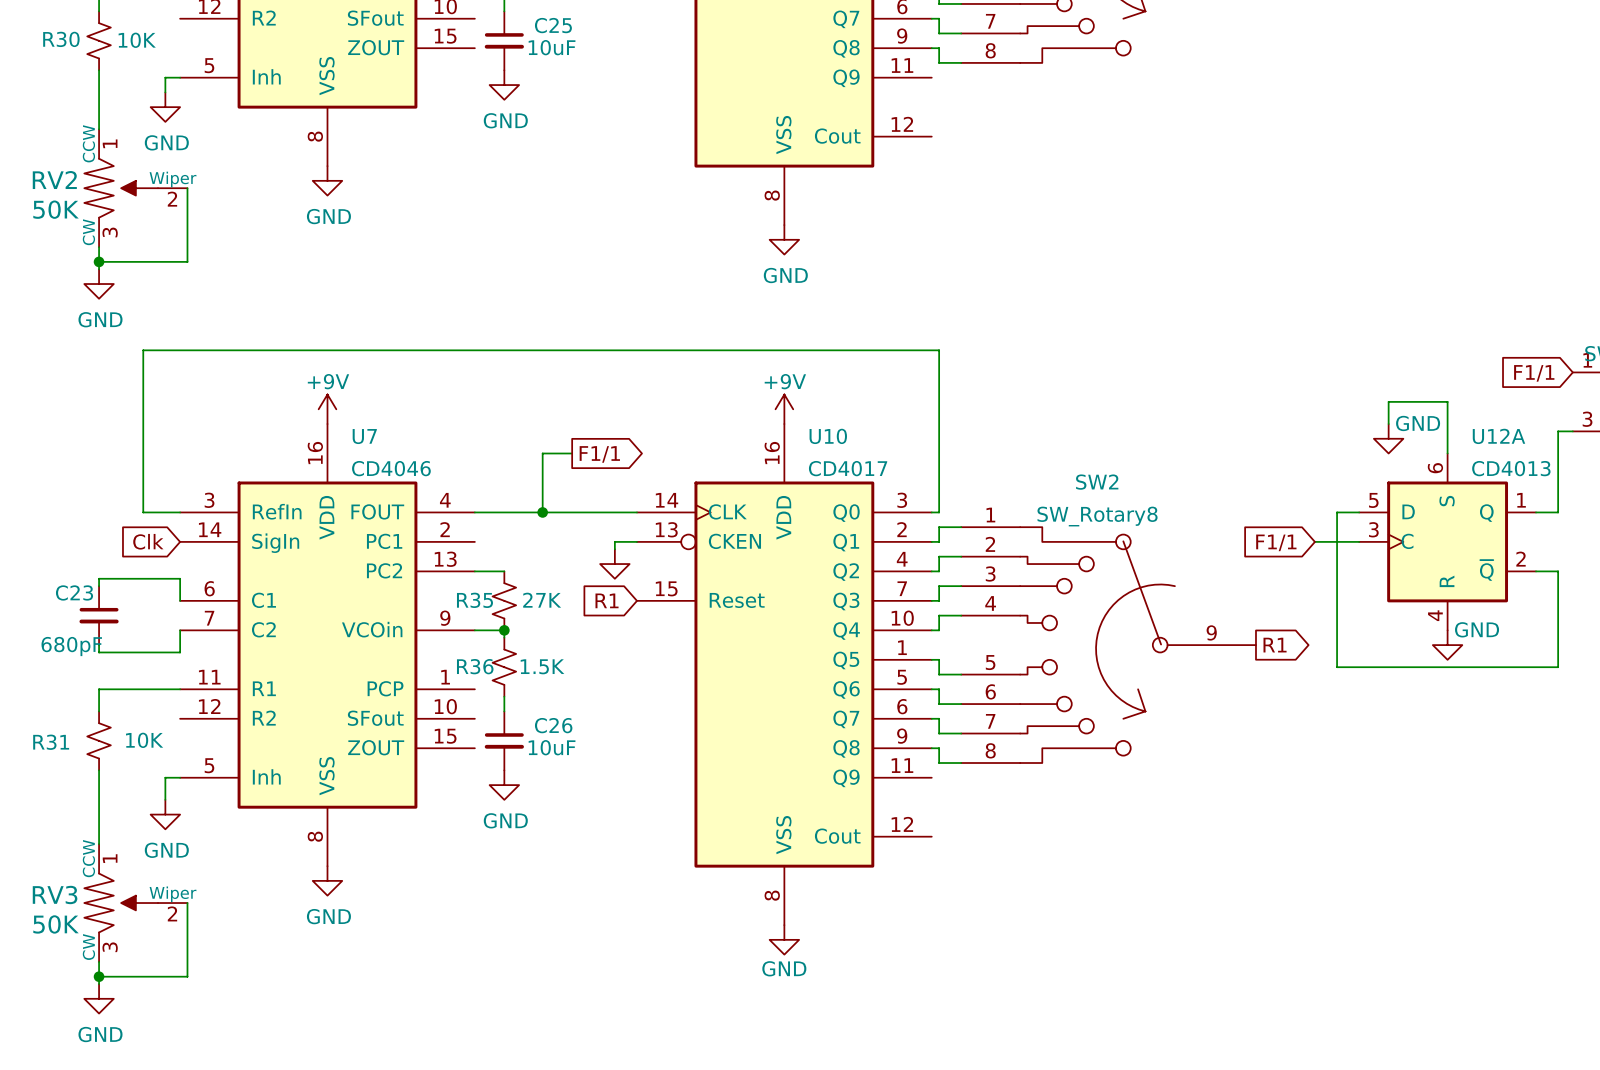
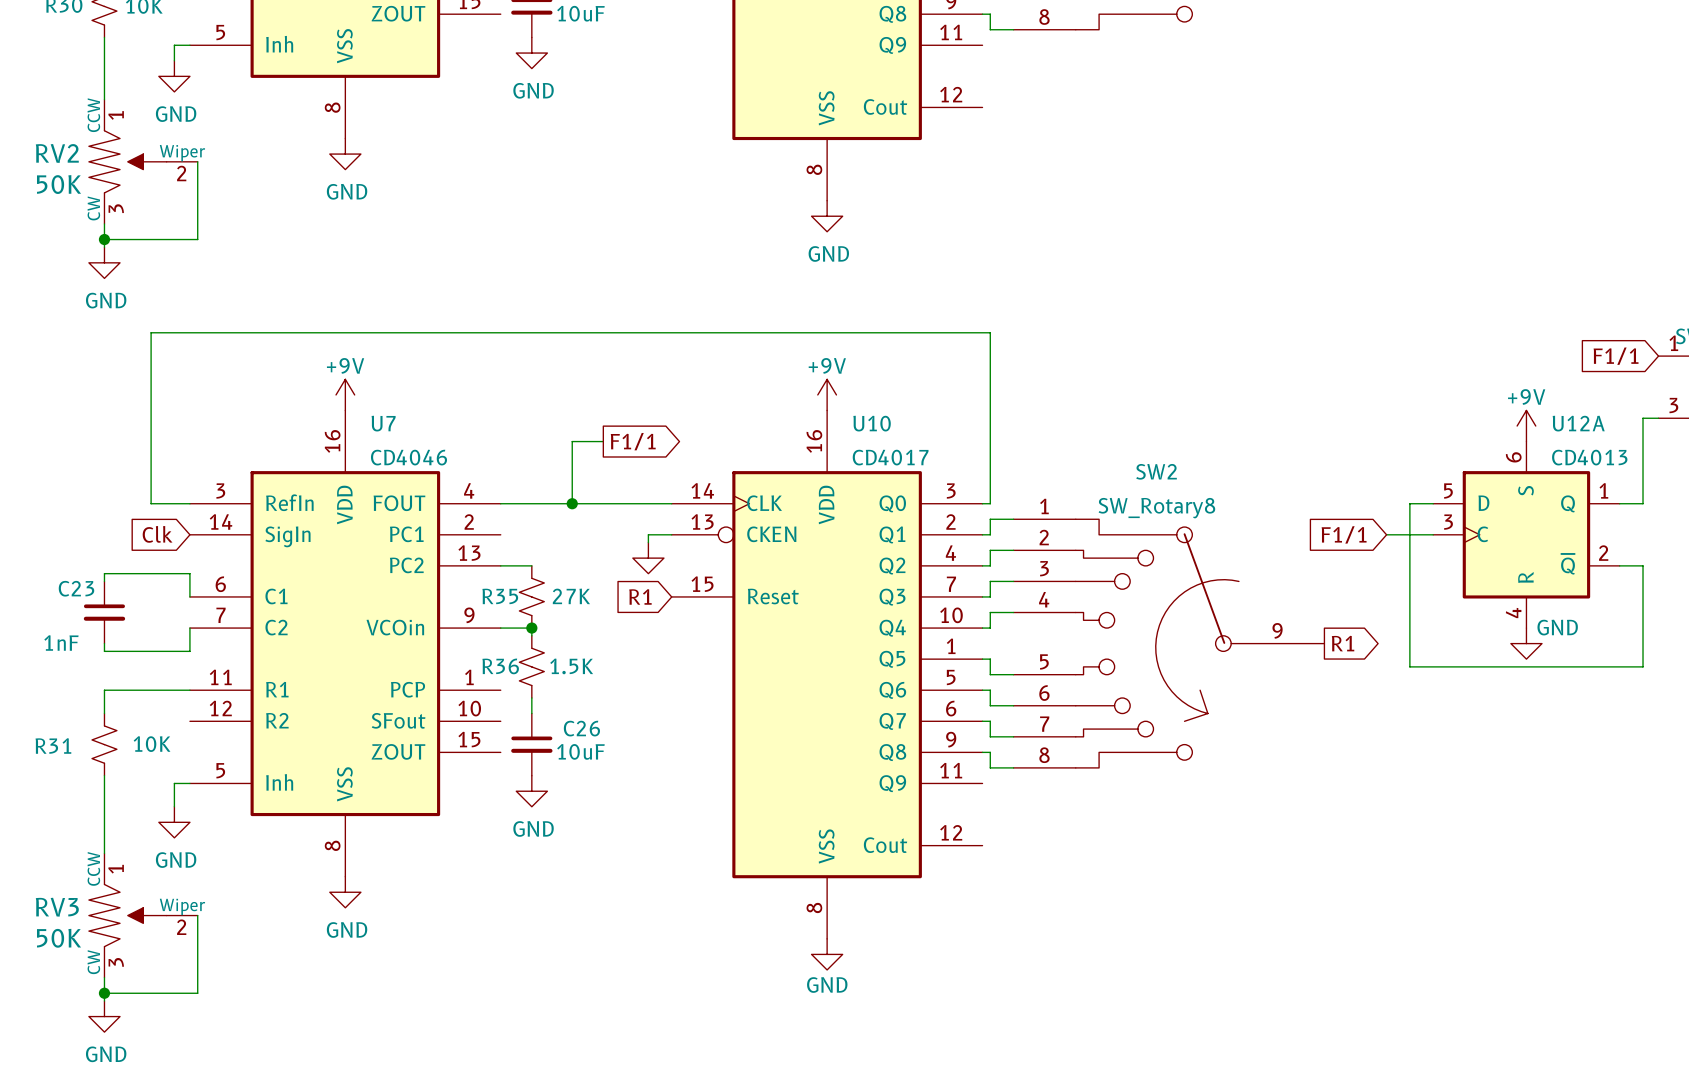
wire: (1388, 424) (1388, 401) (1447, 401) (1447, 453) -> none
power symbol: GND (1388, 438) -> none
power symbol: none -> +9V (1526, 426)
C23 value: 680pF (71, 646) -> 1nF (61, 643)

